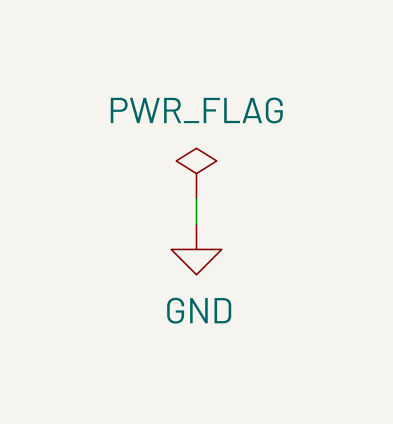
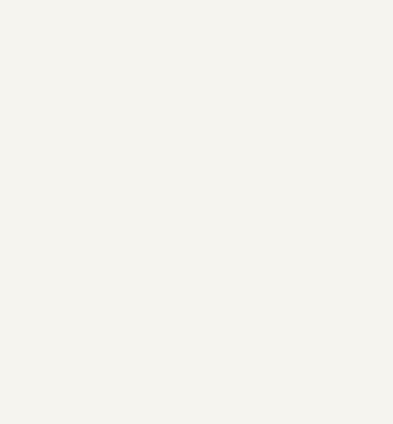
power symbol: PWR_FLAG (196, 173) -> none
wire: (196, 198) (196, 224) -> none
power symbol: GND (196, 249) -> none

